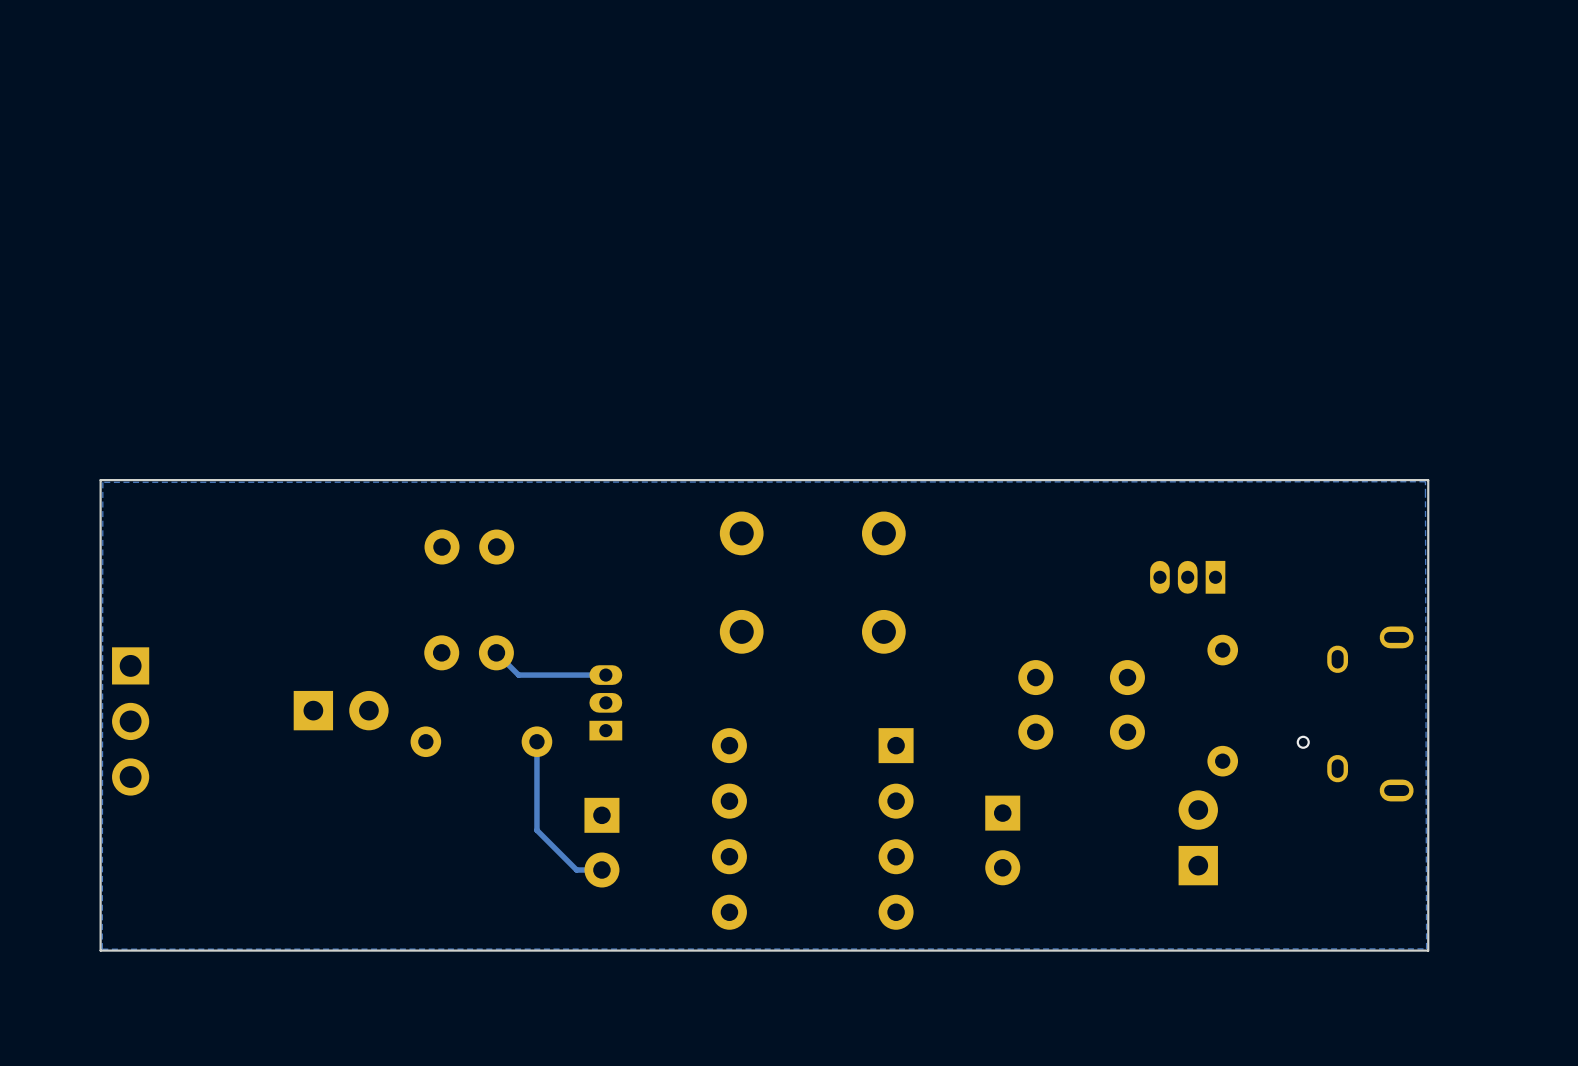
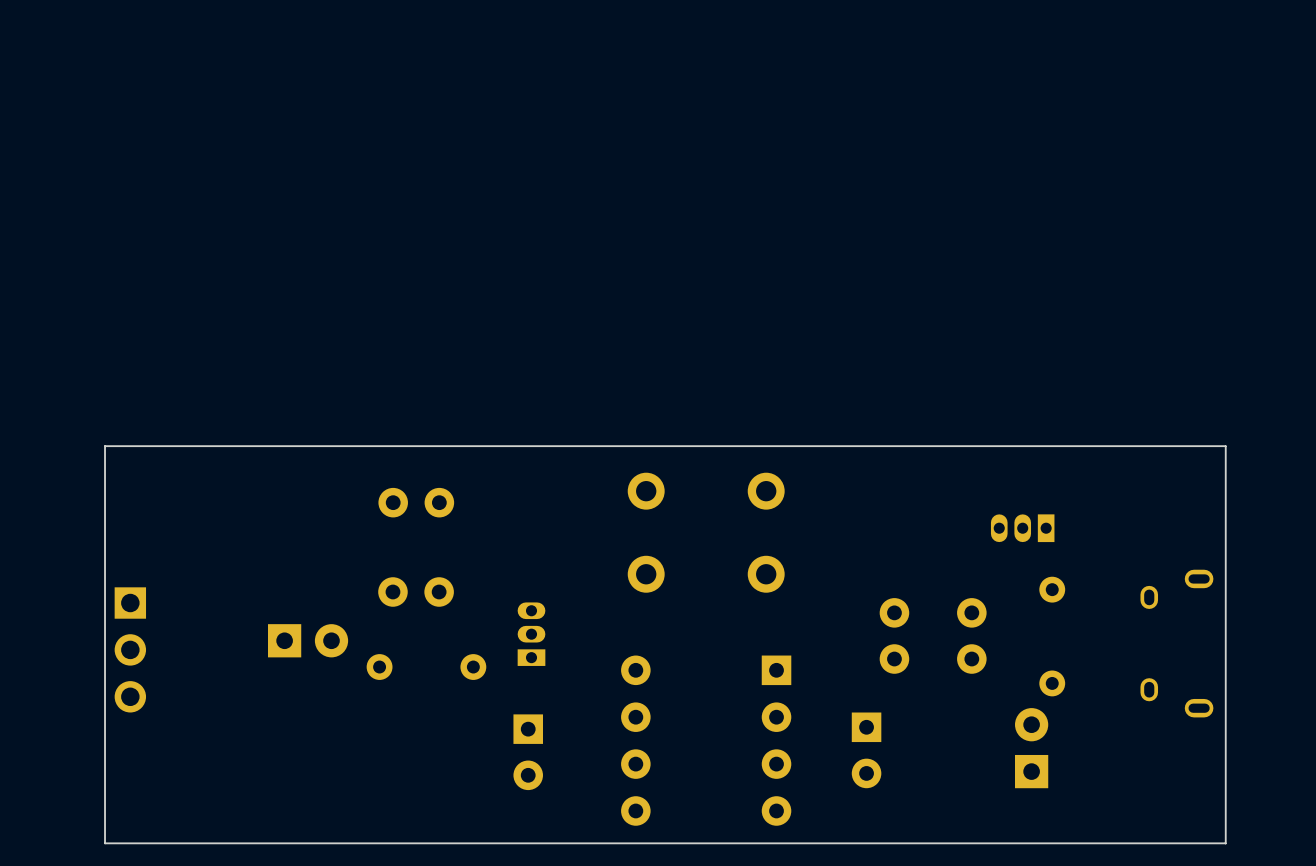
zone outline: (1425, 481) (1426, 948) (102, 949) (102, 482) (1425, 481) -> none
track: (496, 652) (518, 675) (605, 675) -> none
track: (536, 741) (536, 830) (576, 870) (601, 870) -> none
via: (1303, 742) -> none

